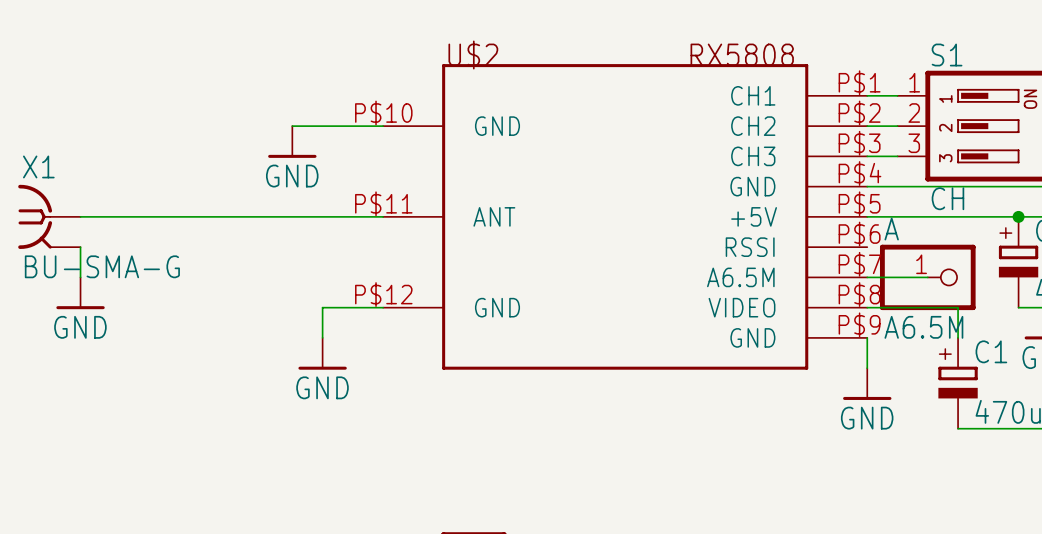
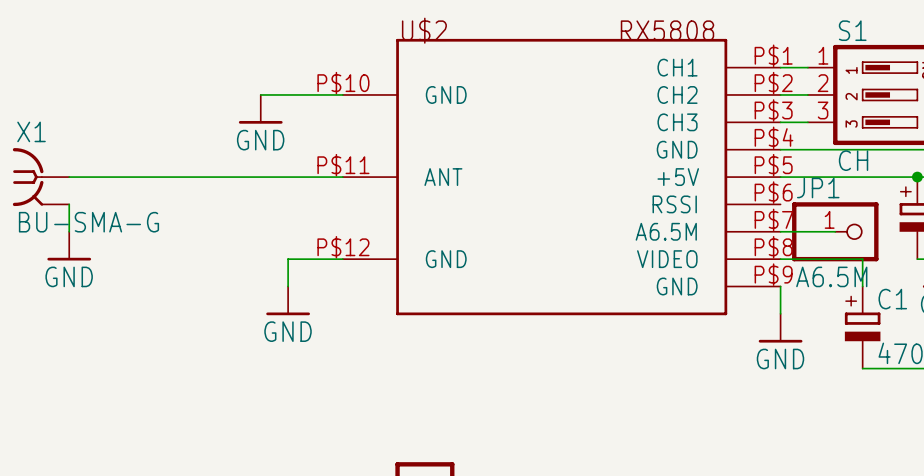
A name: A (891, 228) -> JP1 (818, 188)

